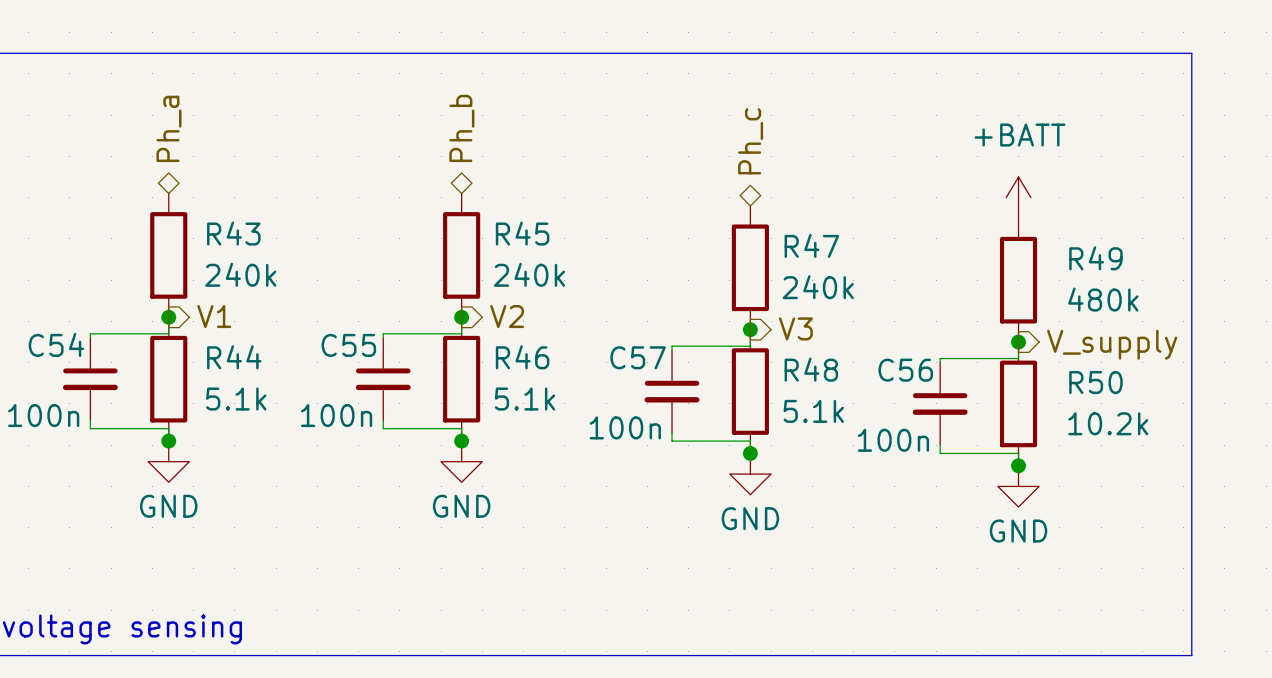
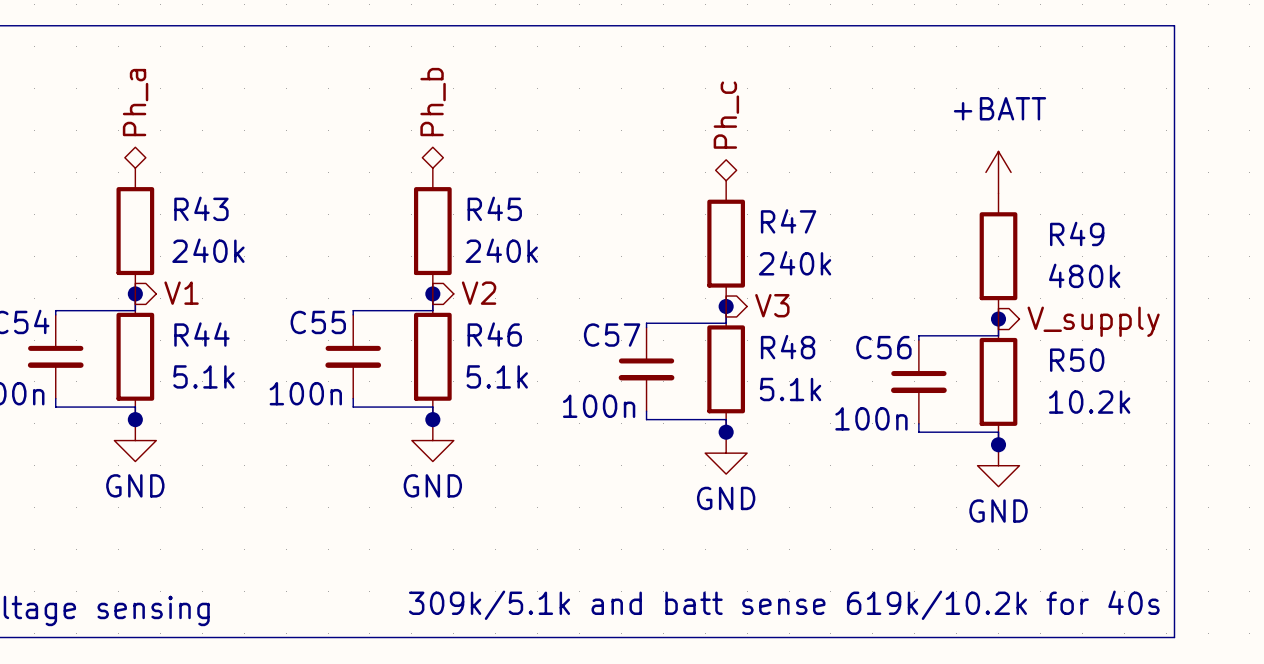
text: none -> 309k/5.1k and batt sense 619k/10.2k for 40s (784, 605)

